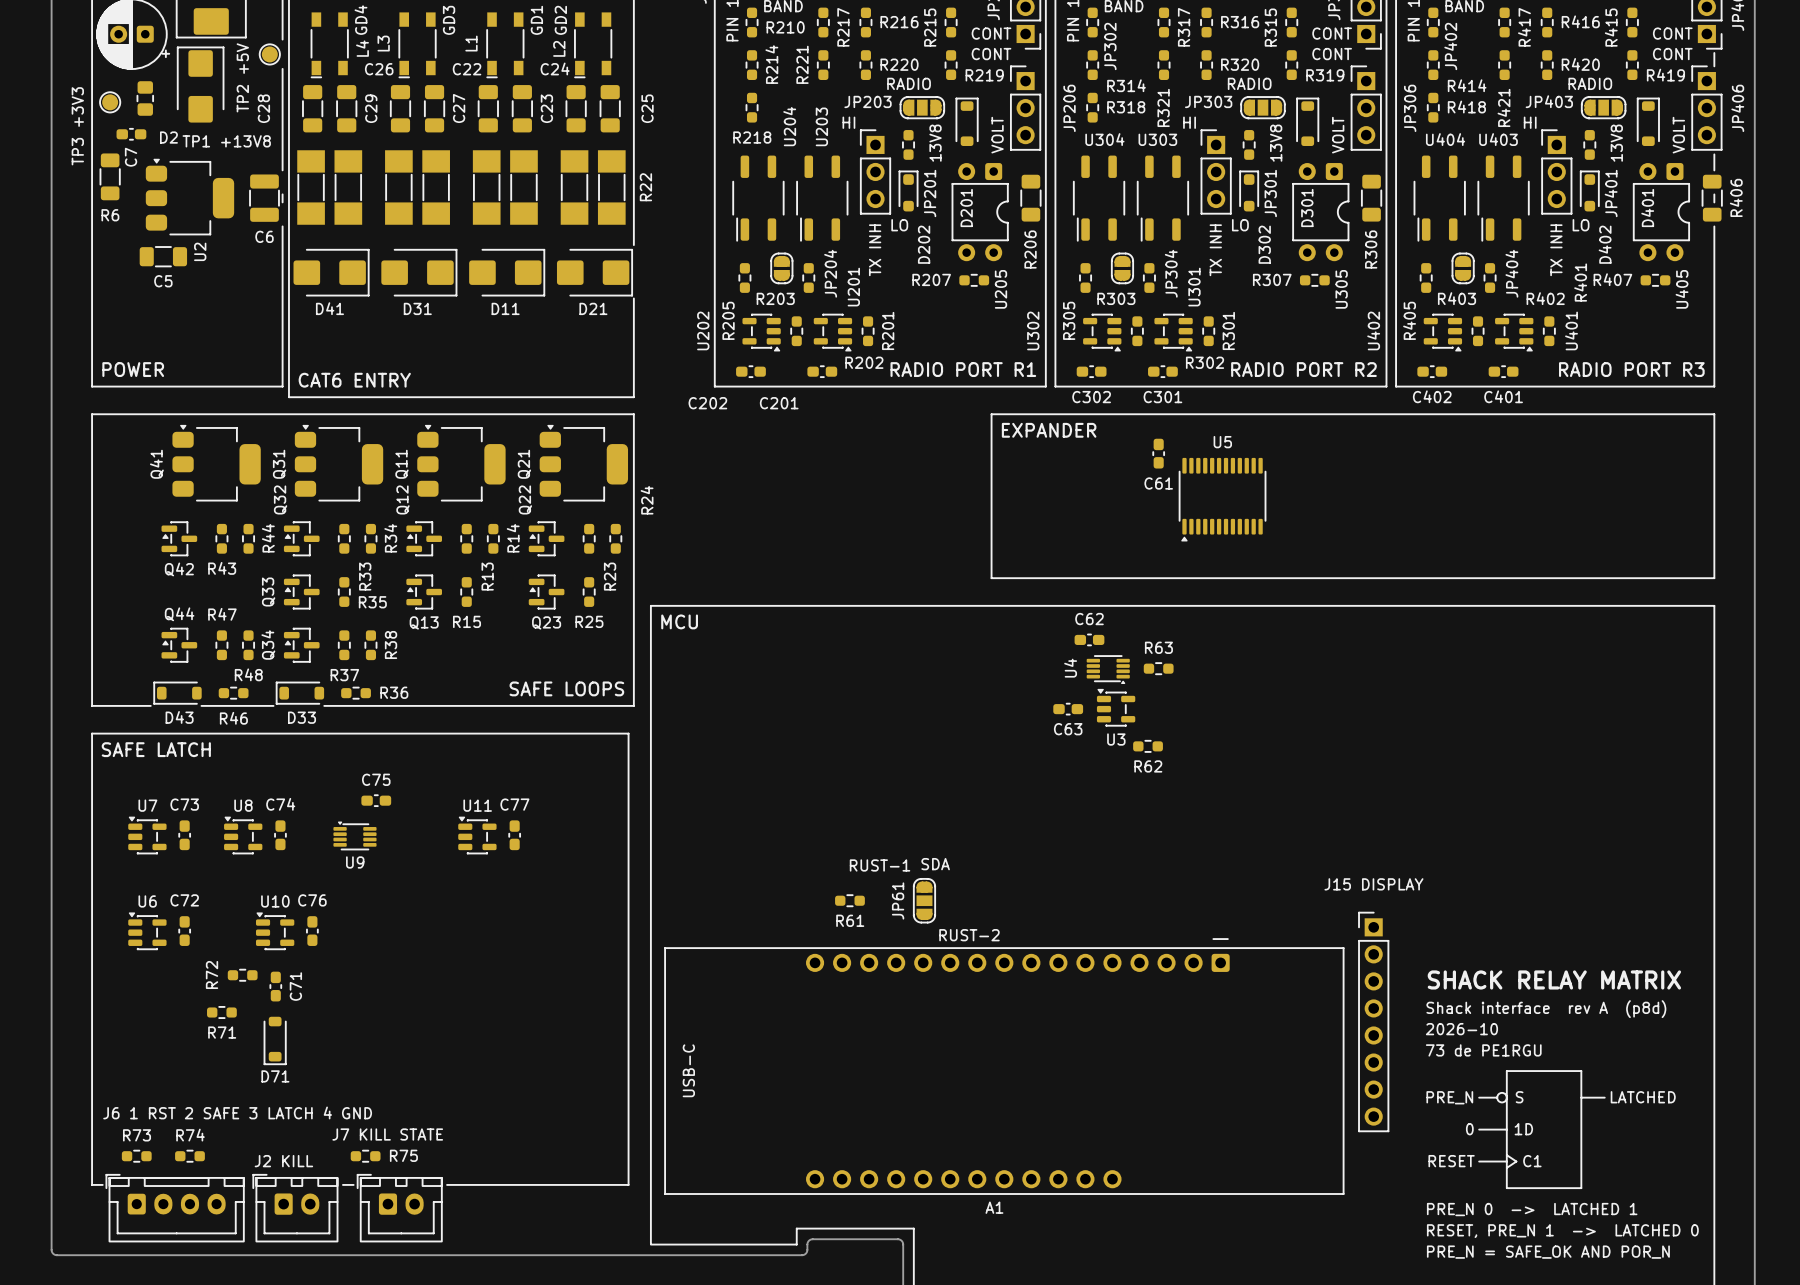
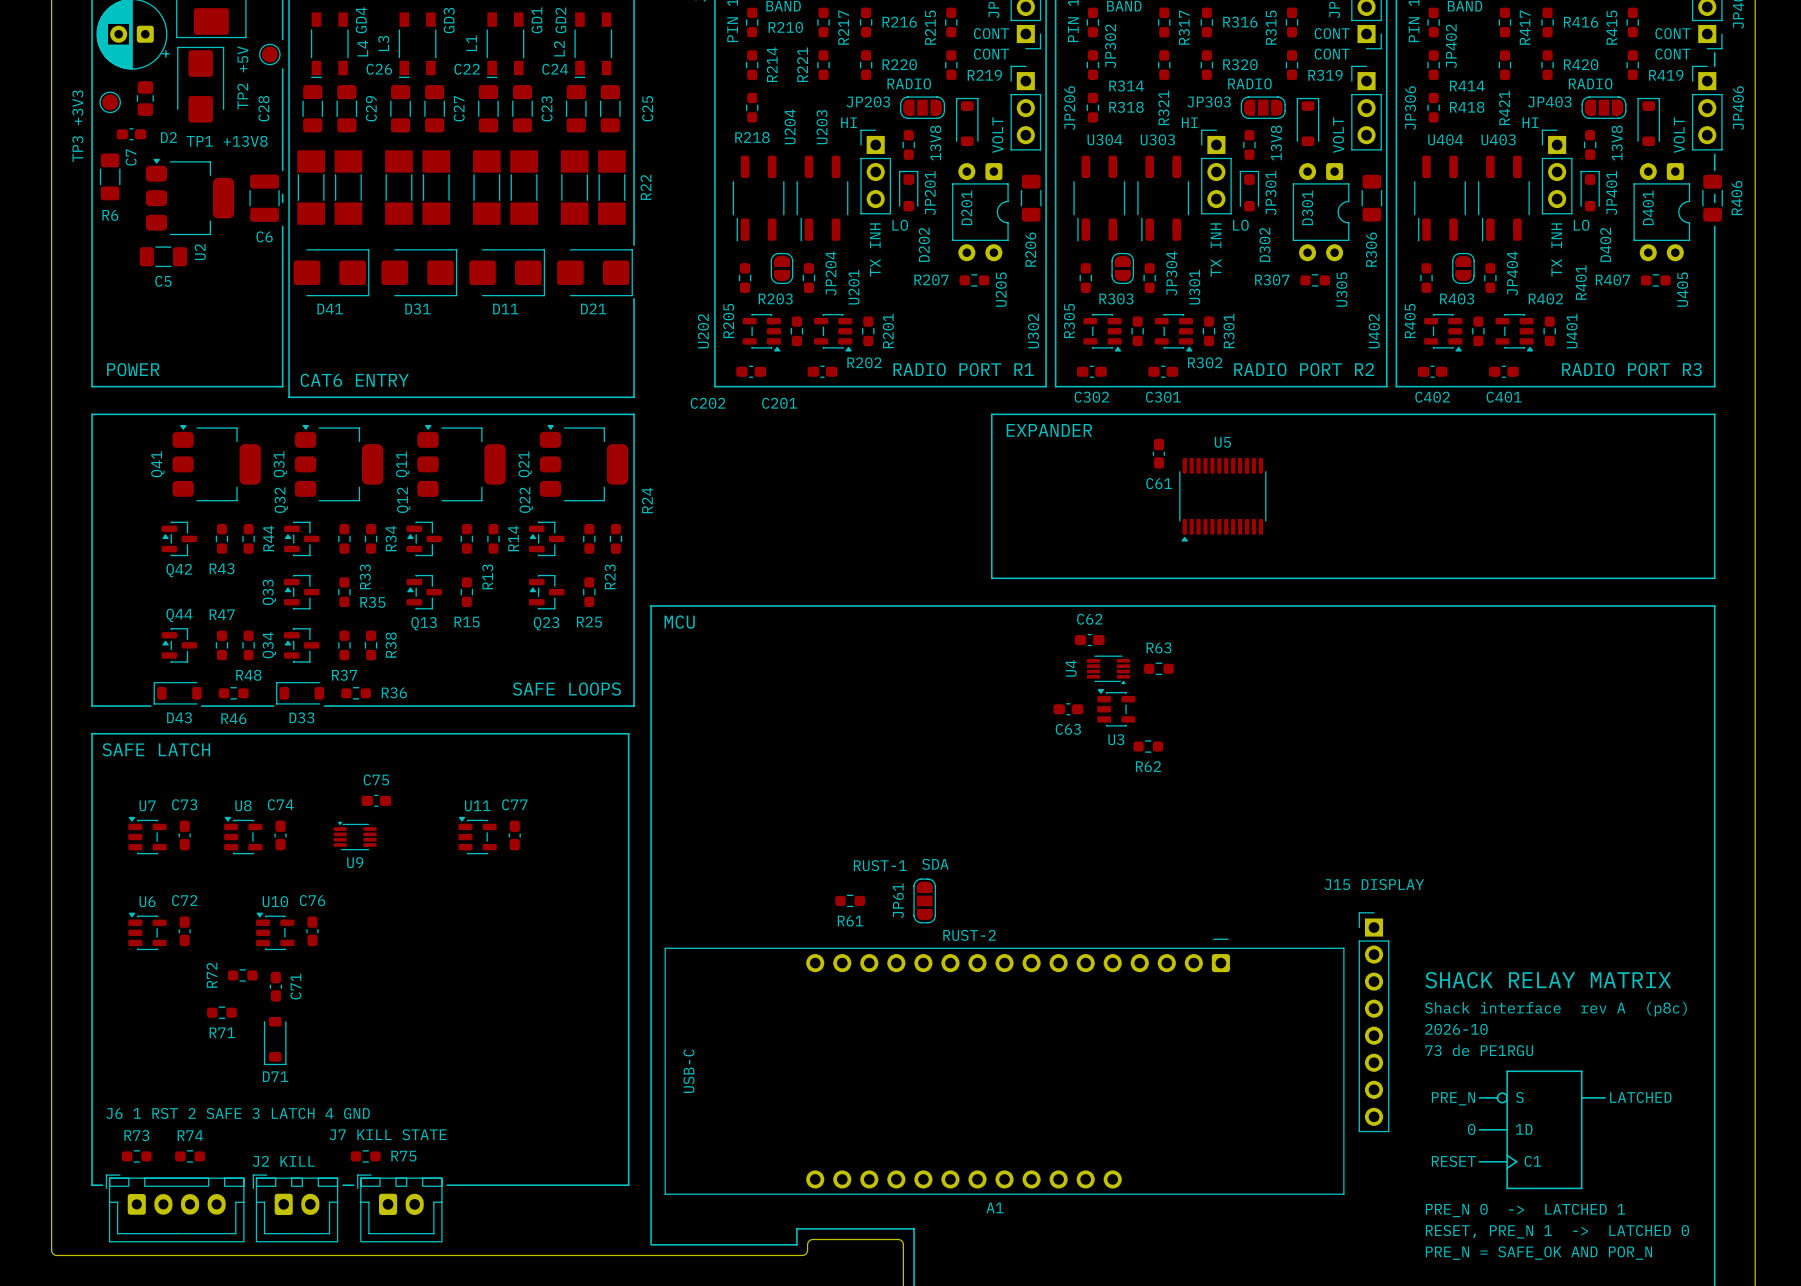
text: Shack interface rev A (p8d) (1546, 1009) -> Shack interface rev A (p8c) (1555, 1009)

